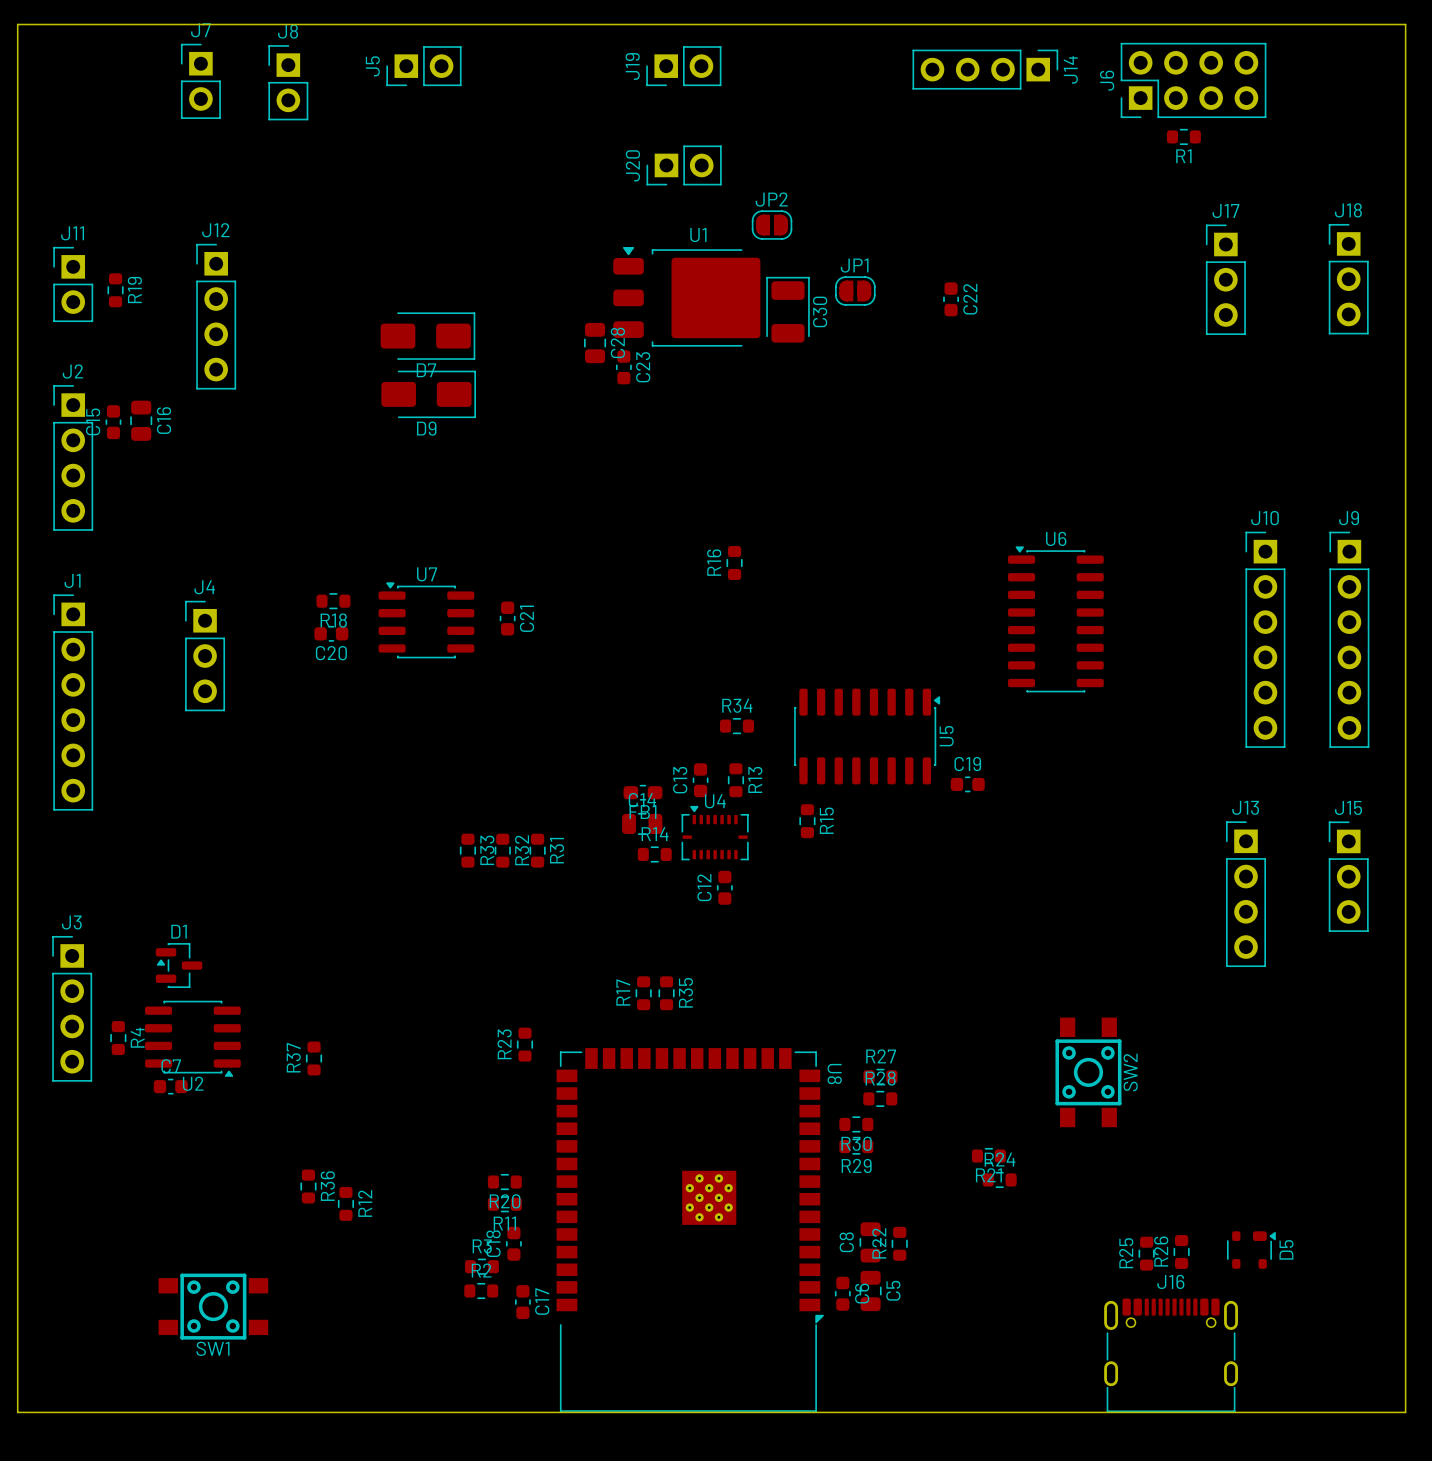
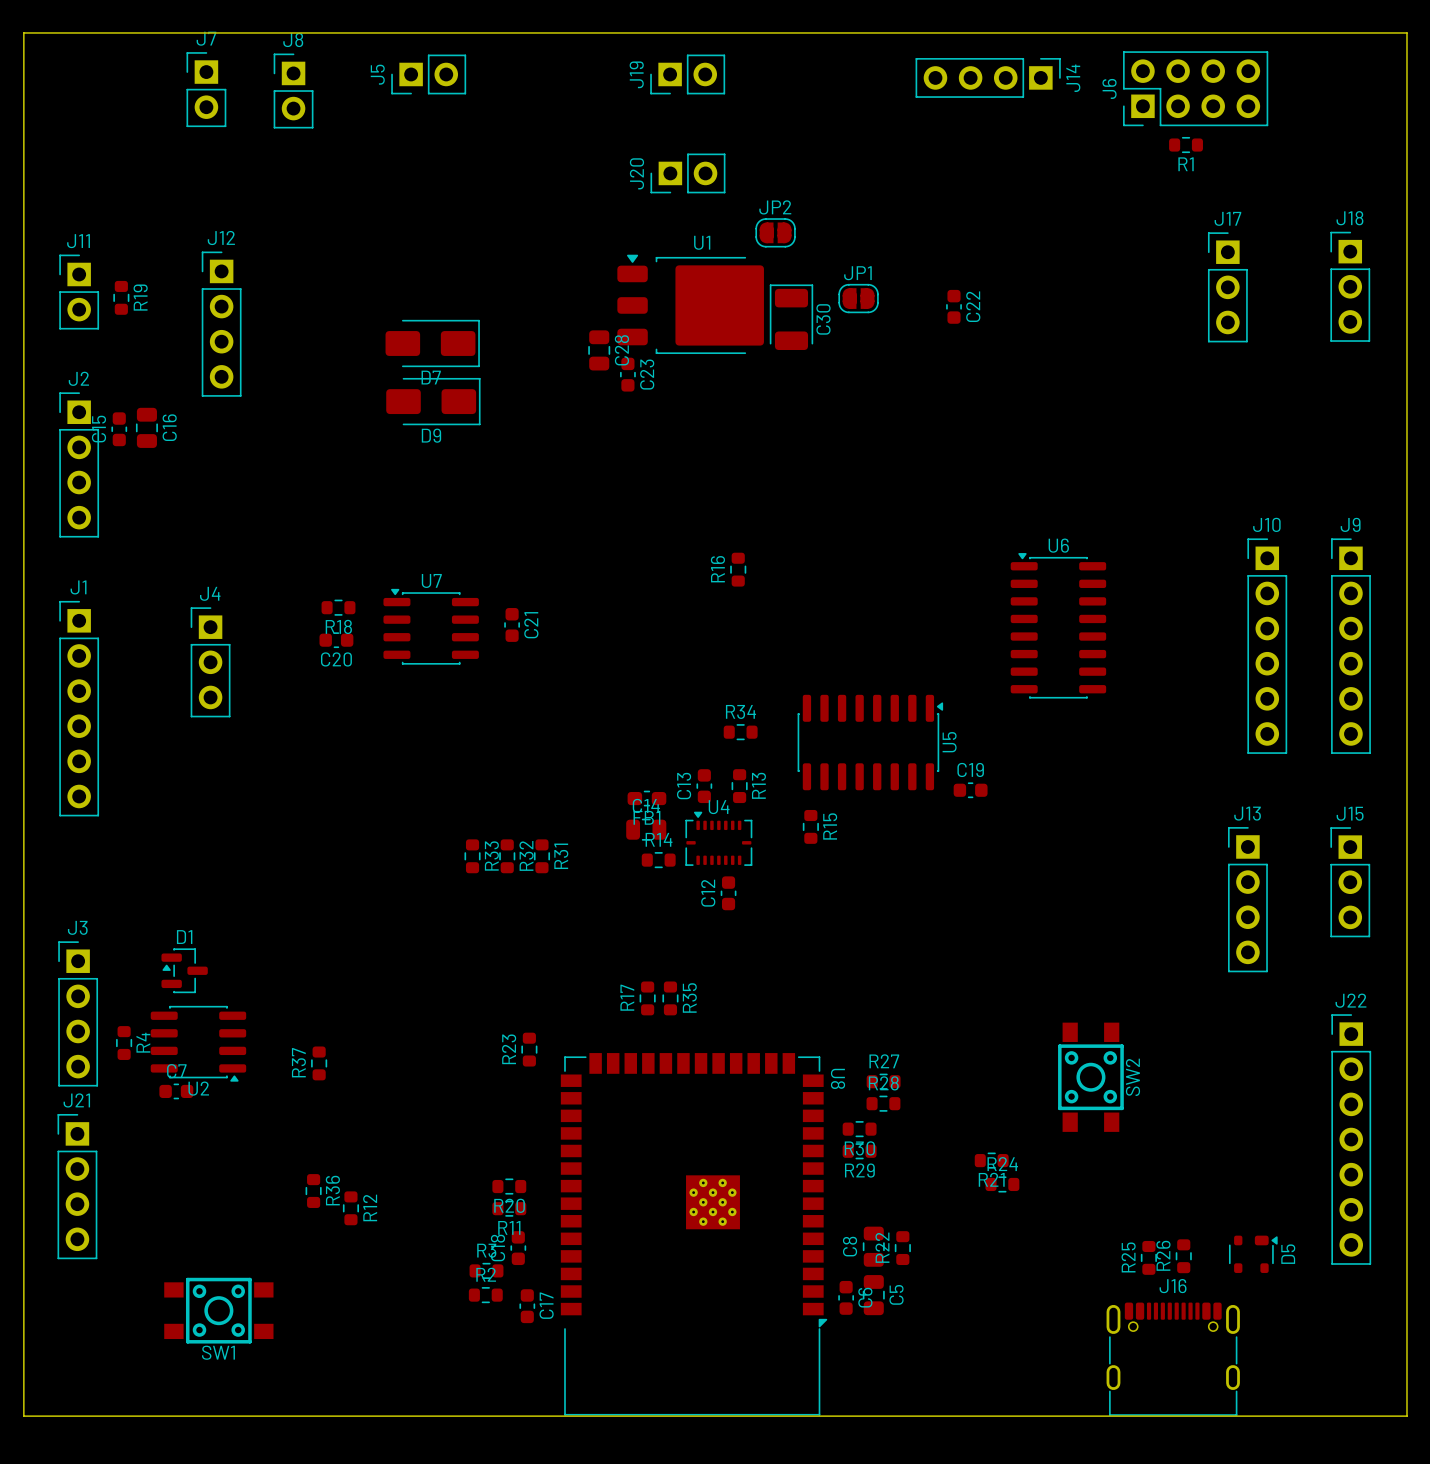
J22: none -> (1351, 1139)
J21: none -> (77, 1186)

